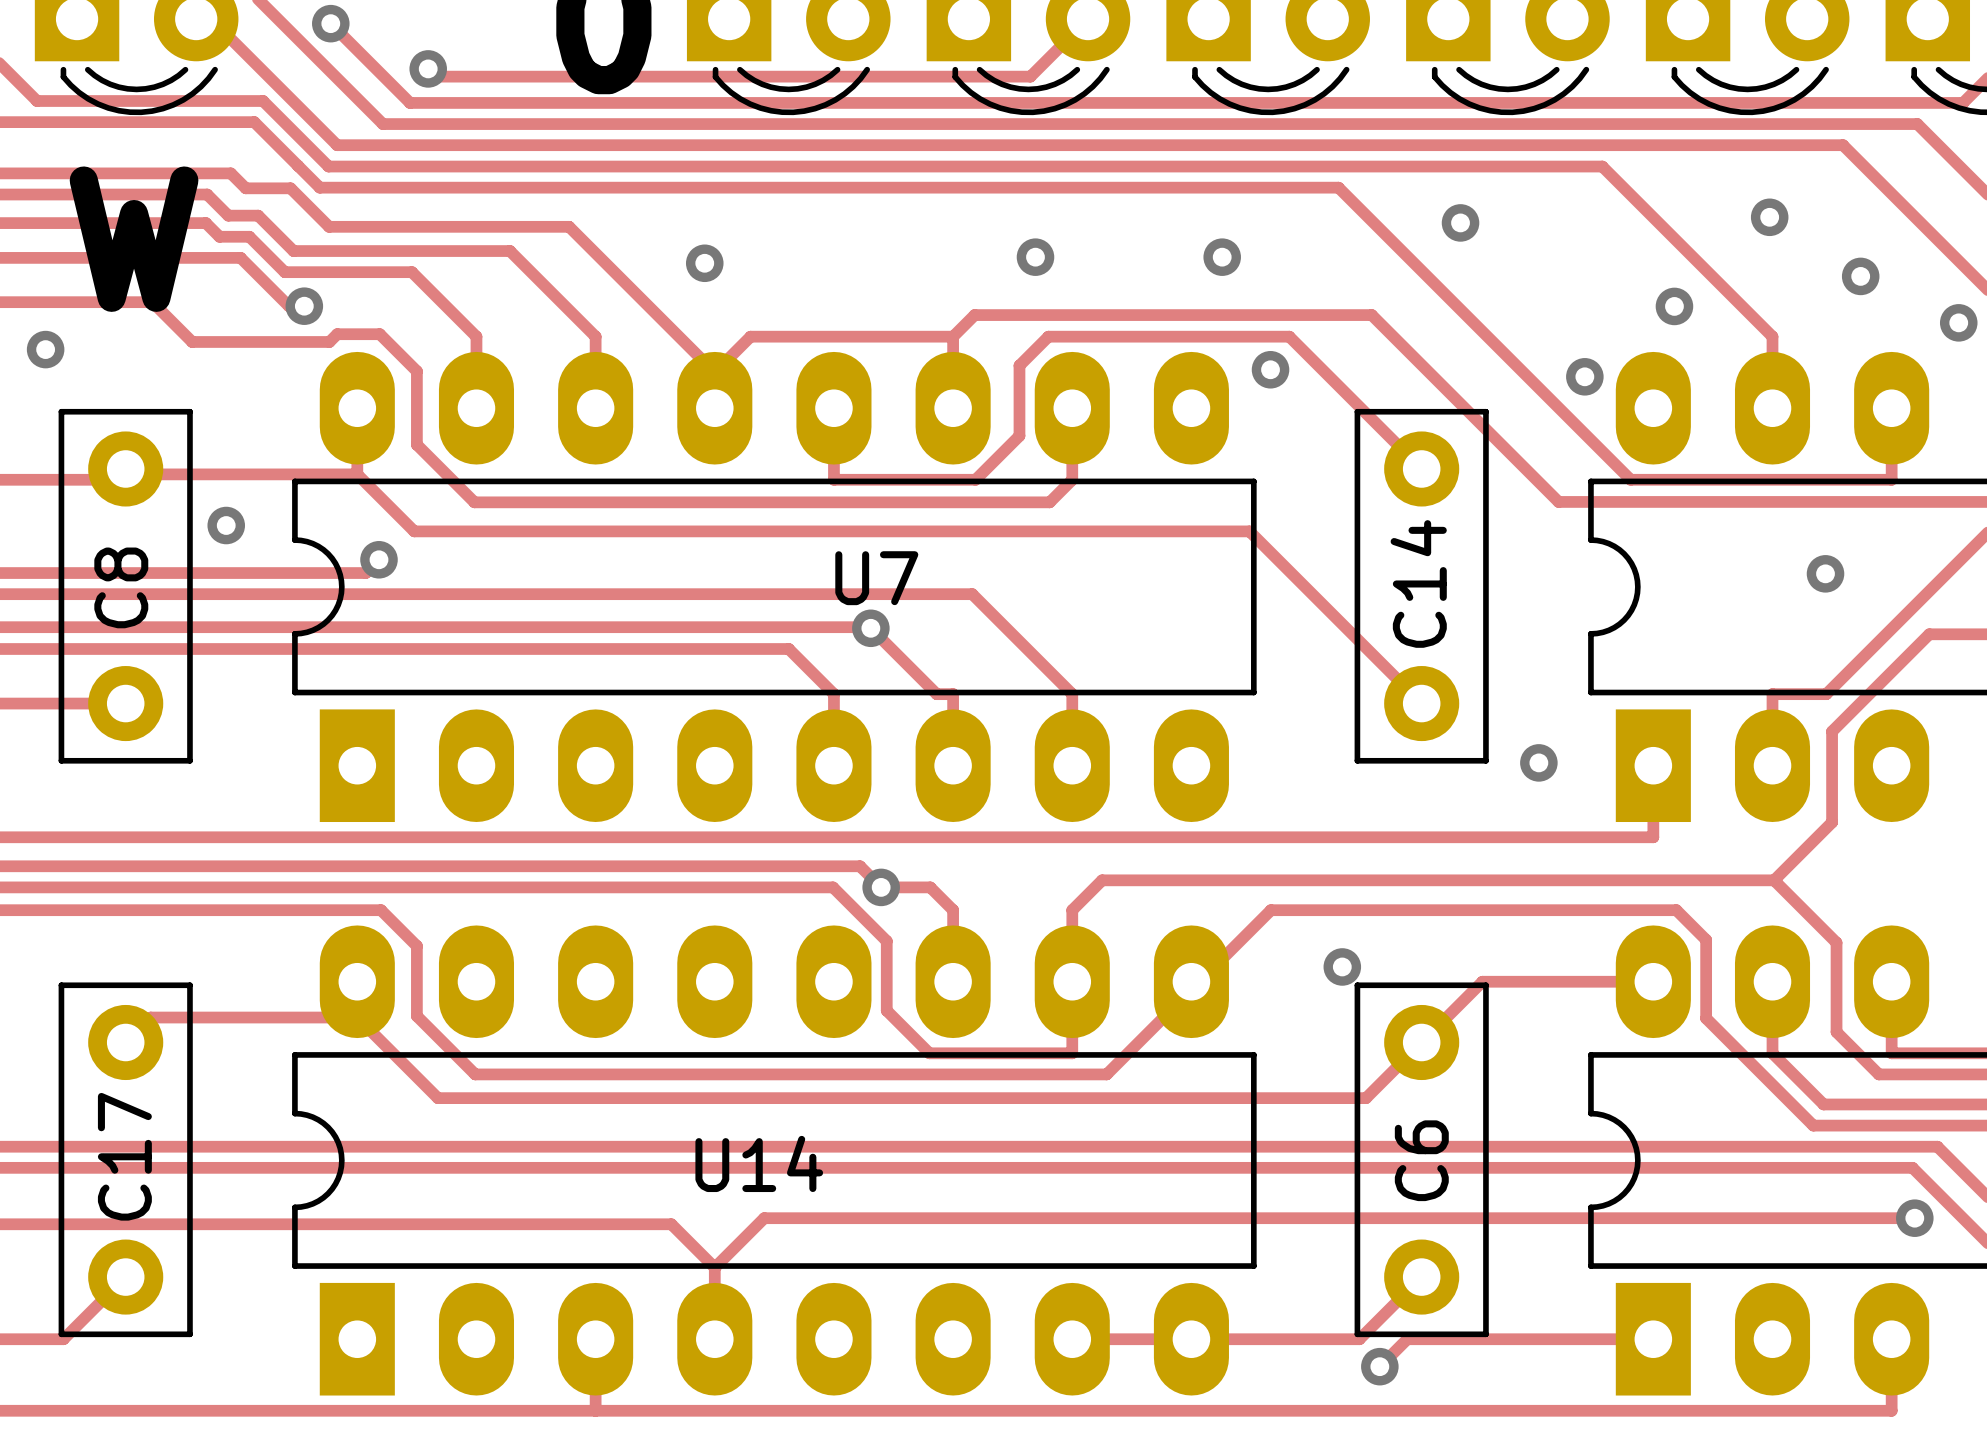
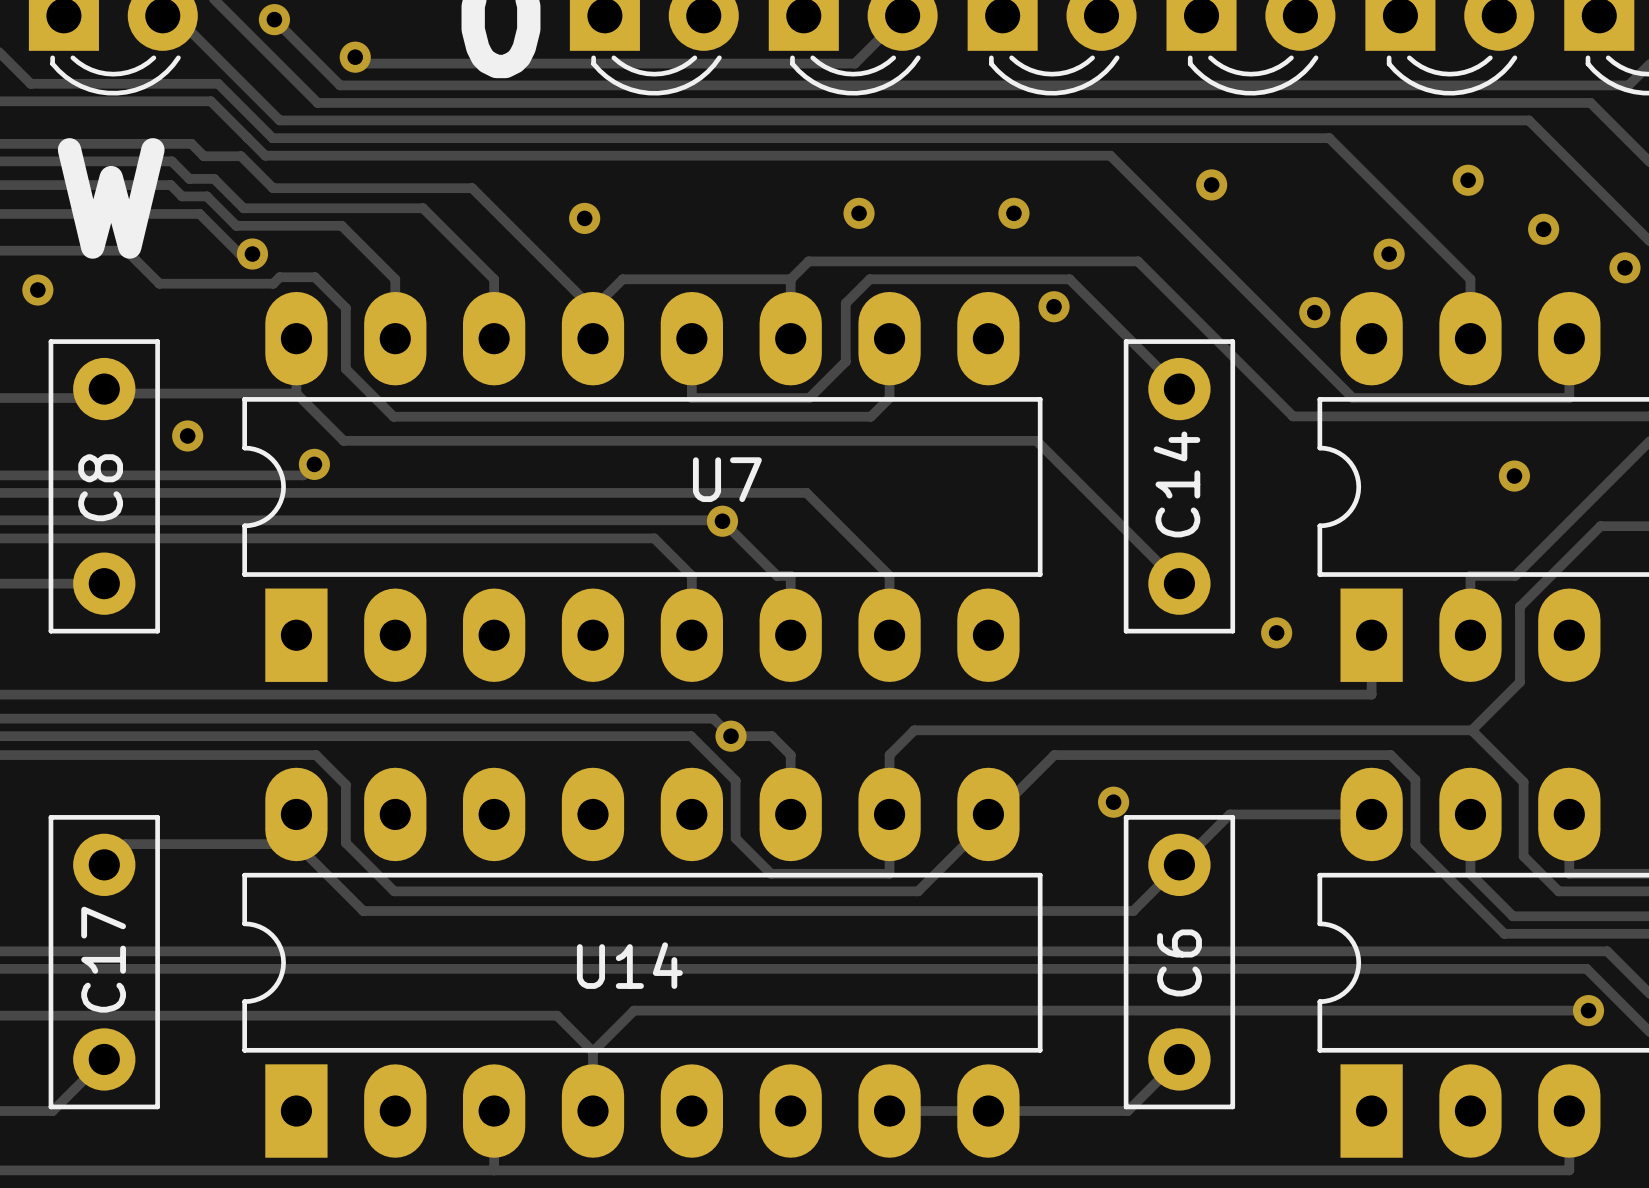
track: (1653, 1339) (1407, 1339) (1379, 1366) -> none
via: (1379, 1366) -> none

